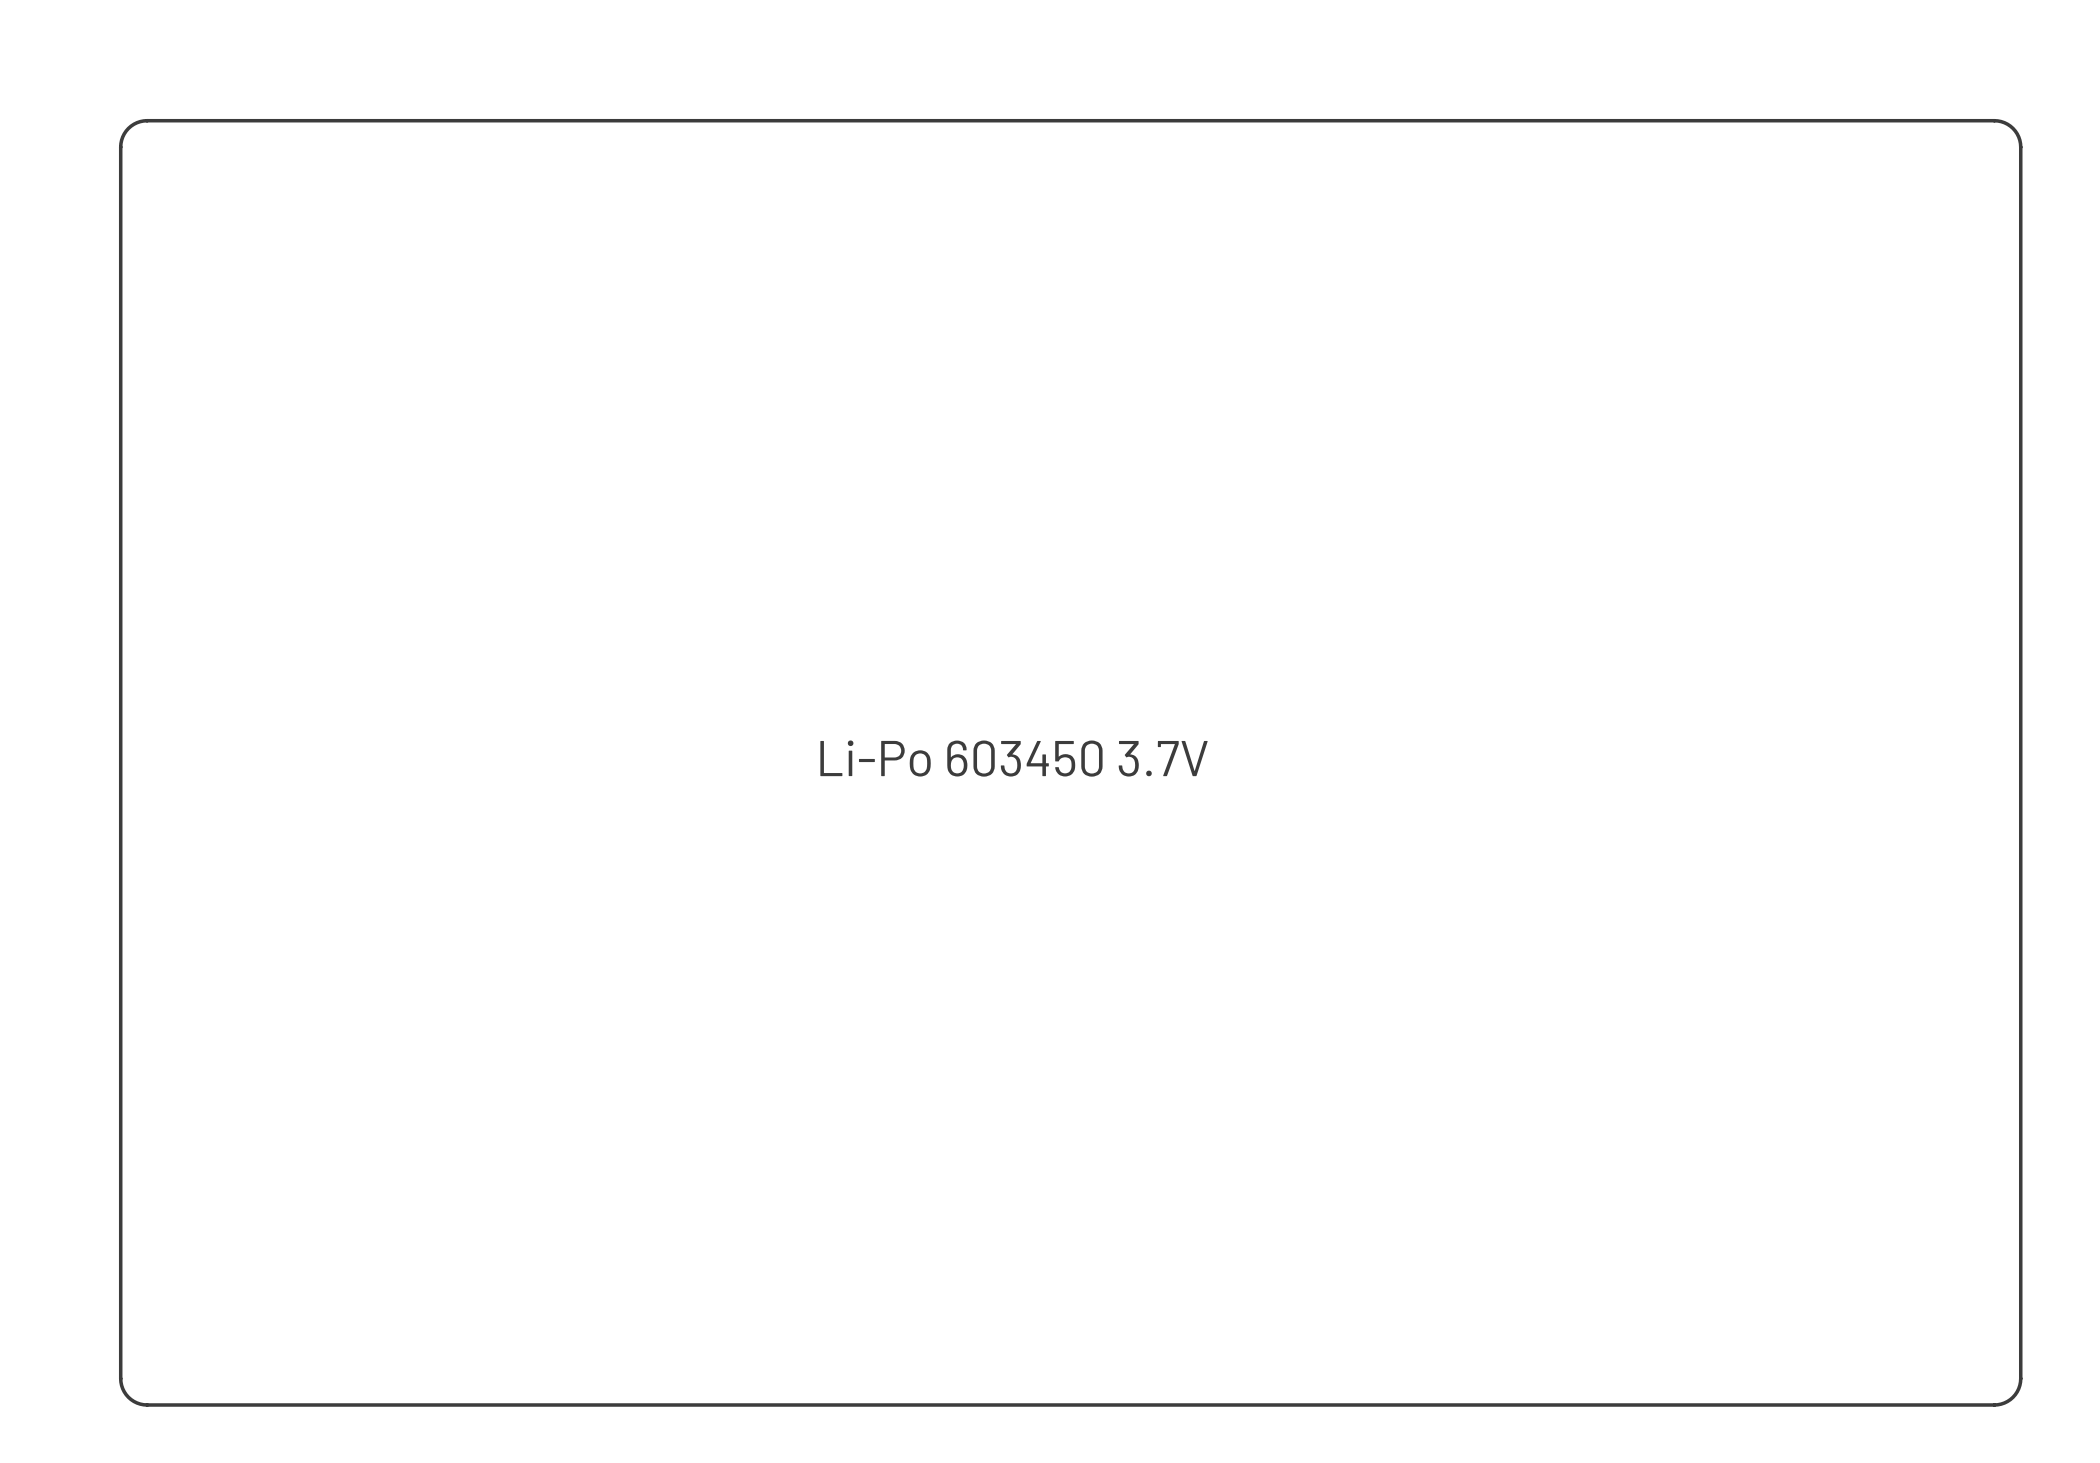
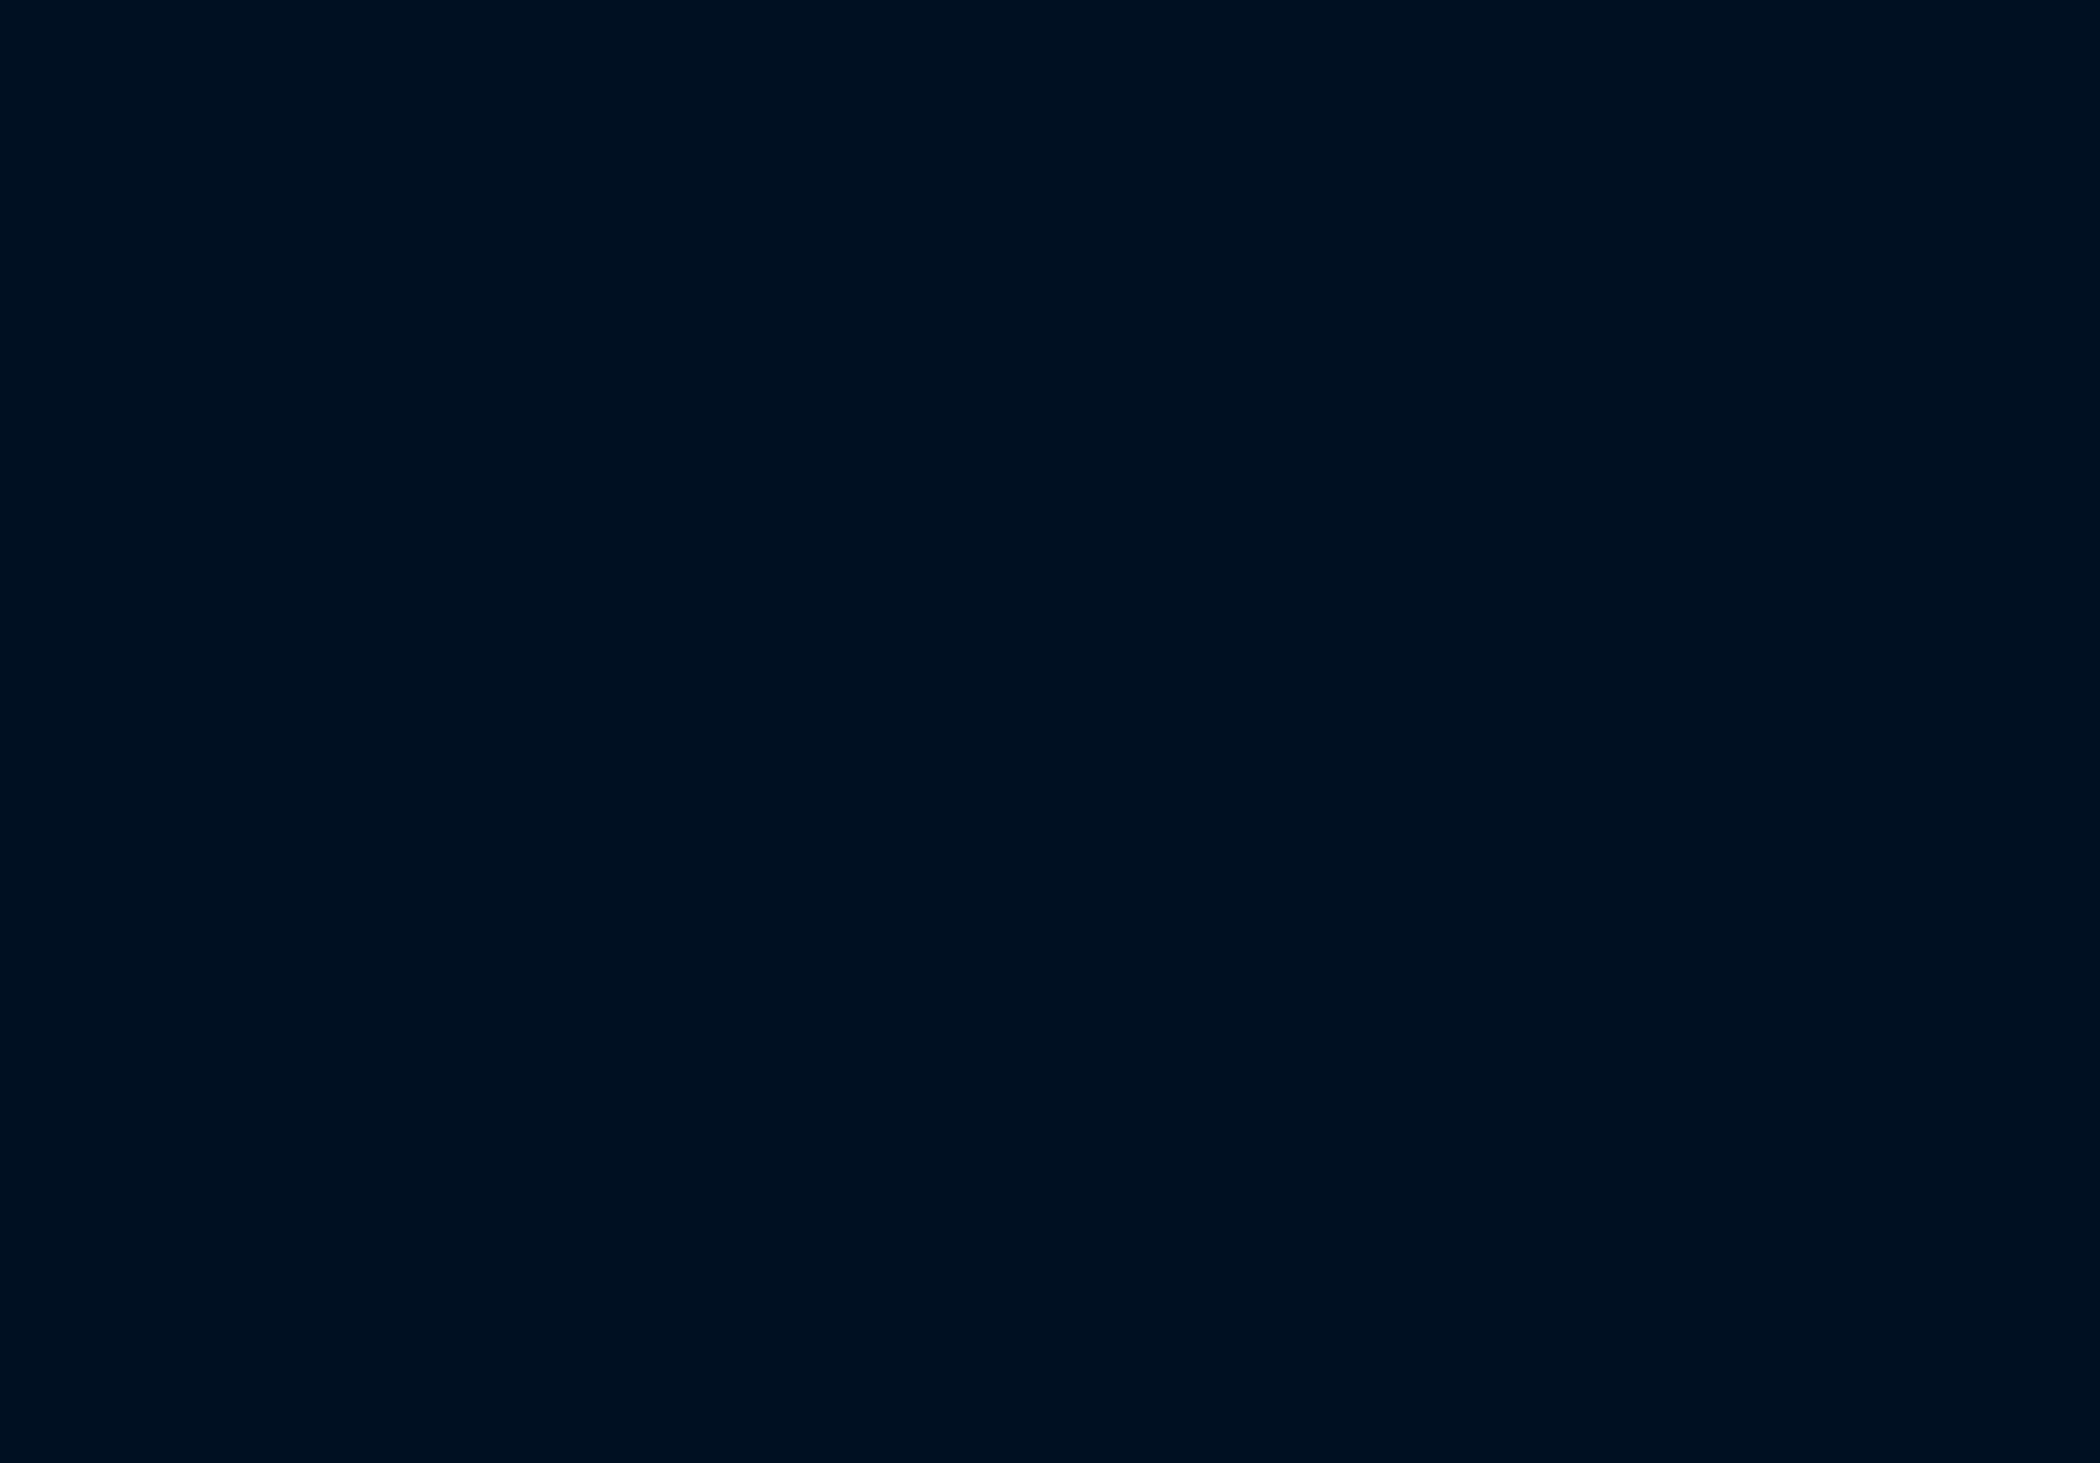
drawing: [118, 118, 2023, 1407] -> none

